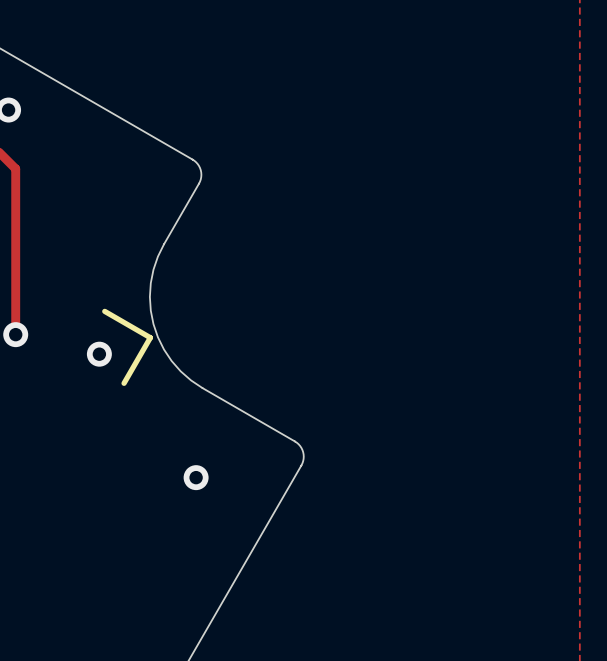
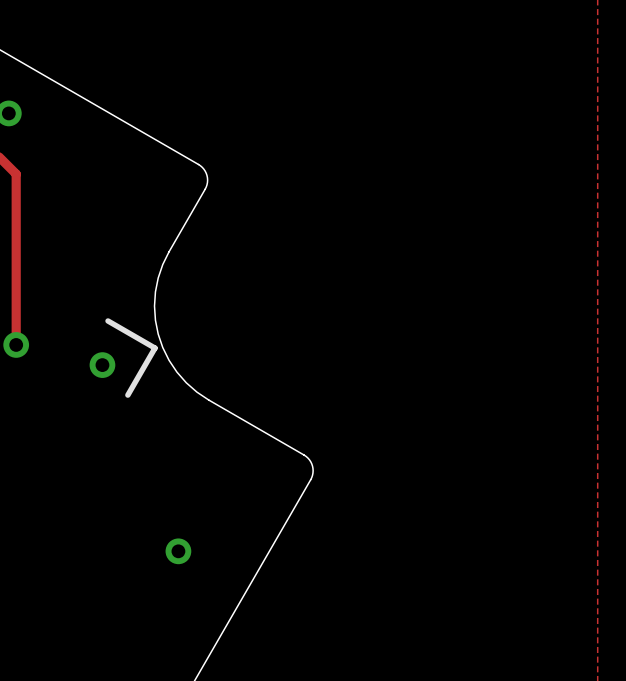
via position: (196, 477) -> (178, 551)

